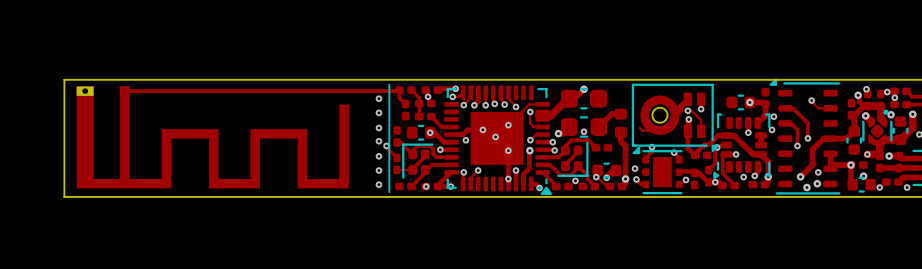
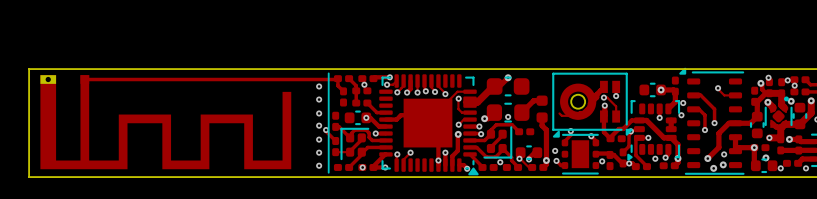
via: (508, 125) -> none
via: (482, 129) -> none
via: (495, 136) -> none
via: (465, 140) -> none
via: (508, 150) -> none

